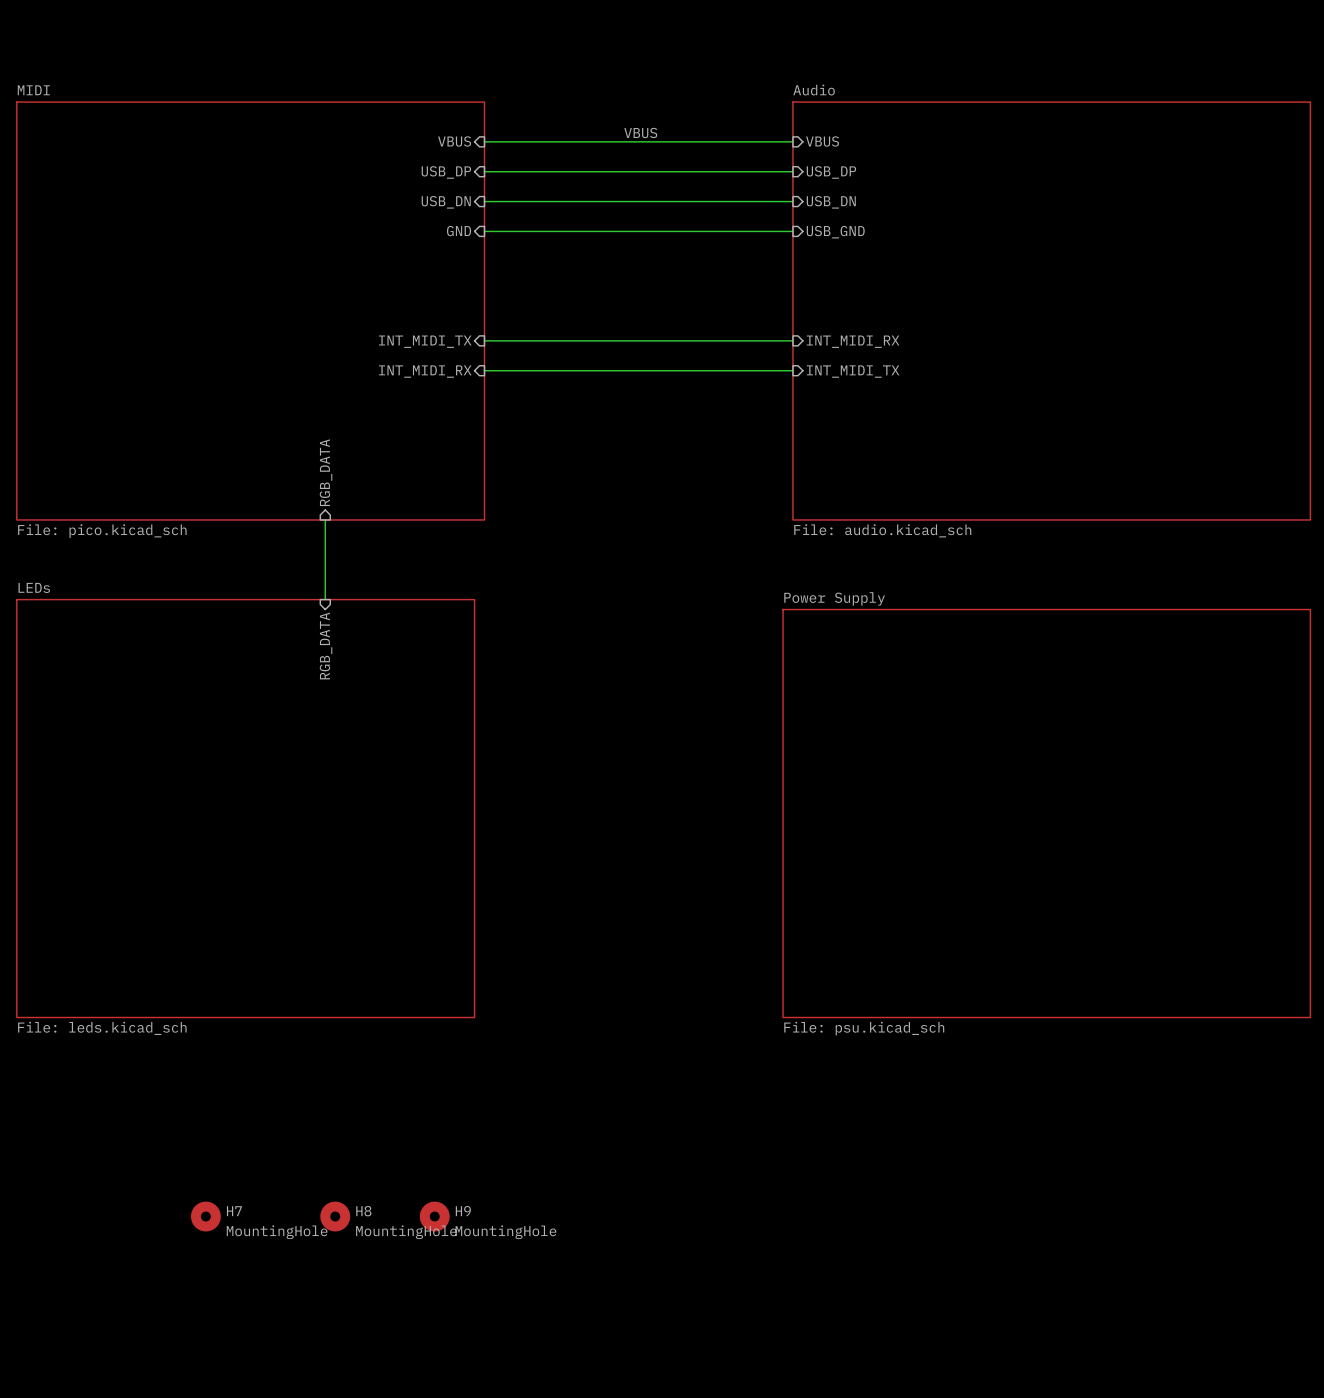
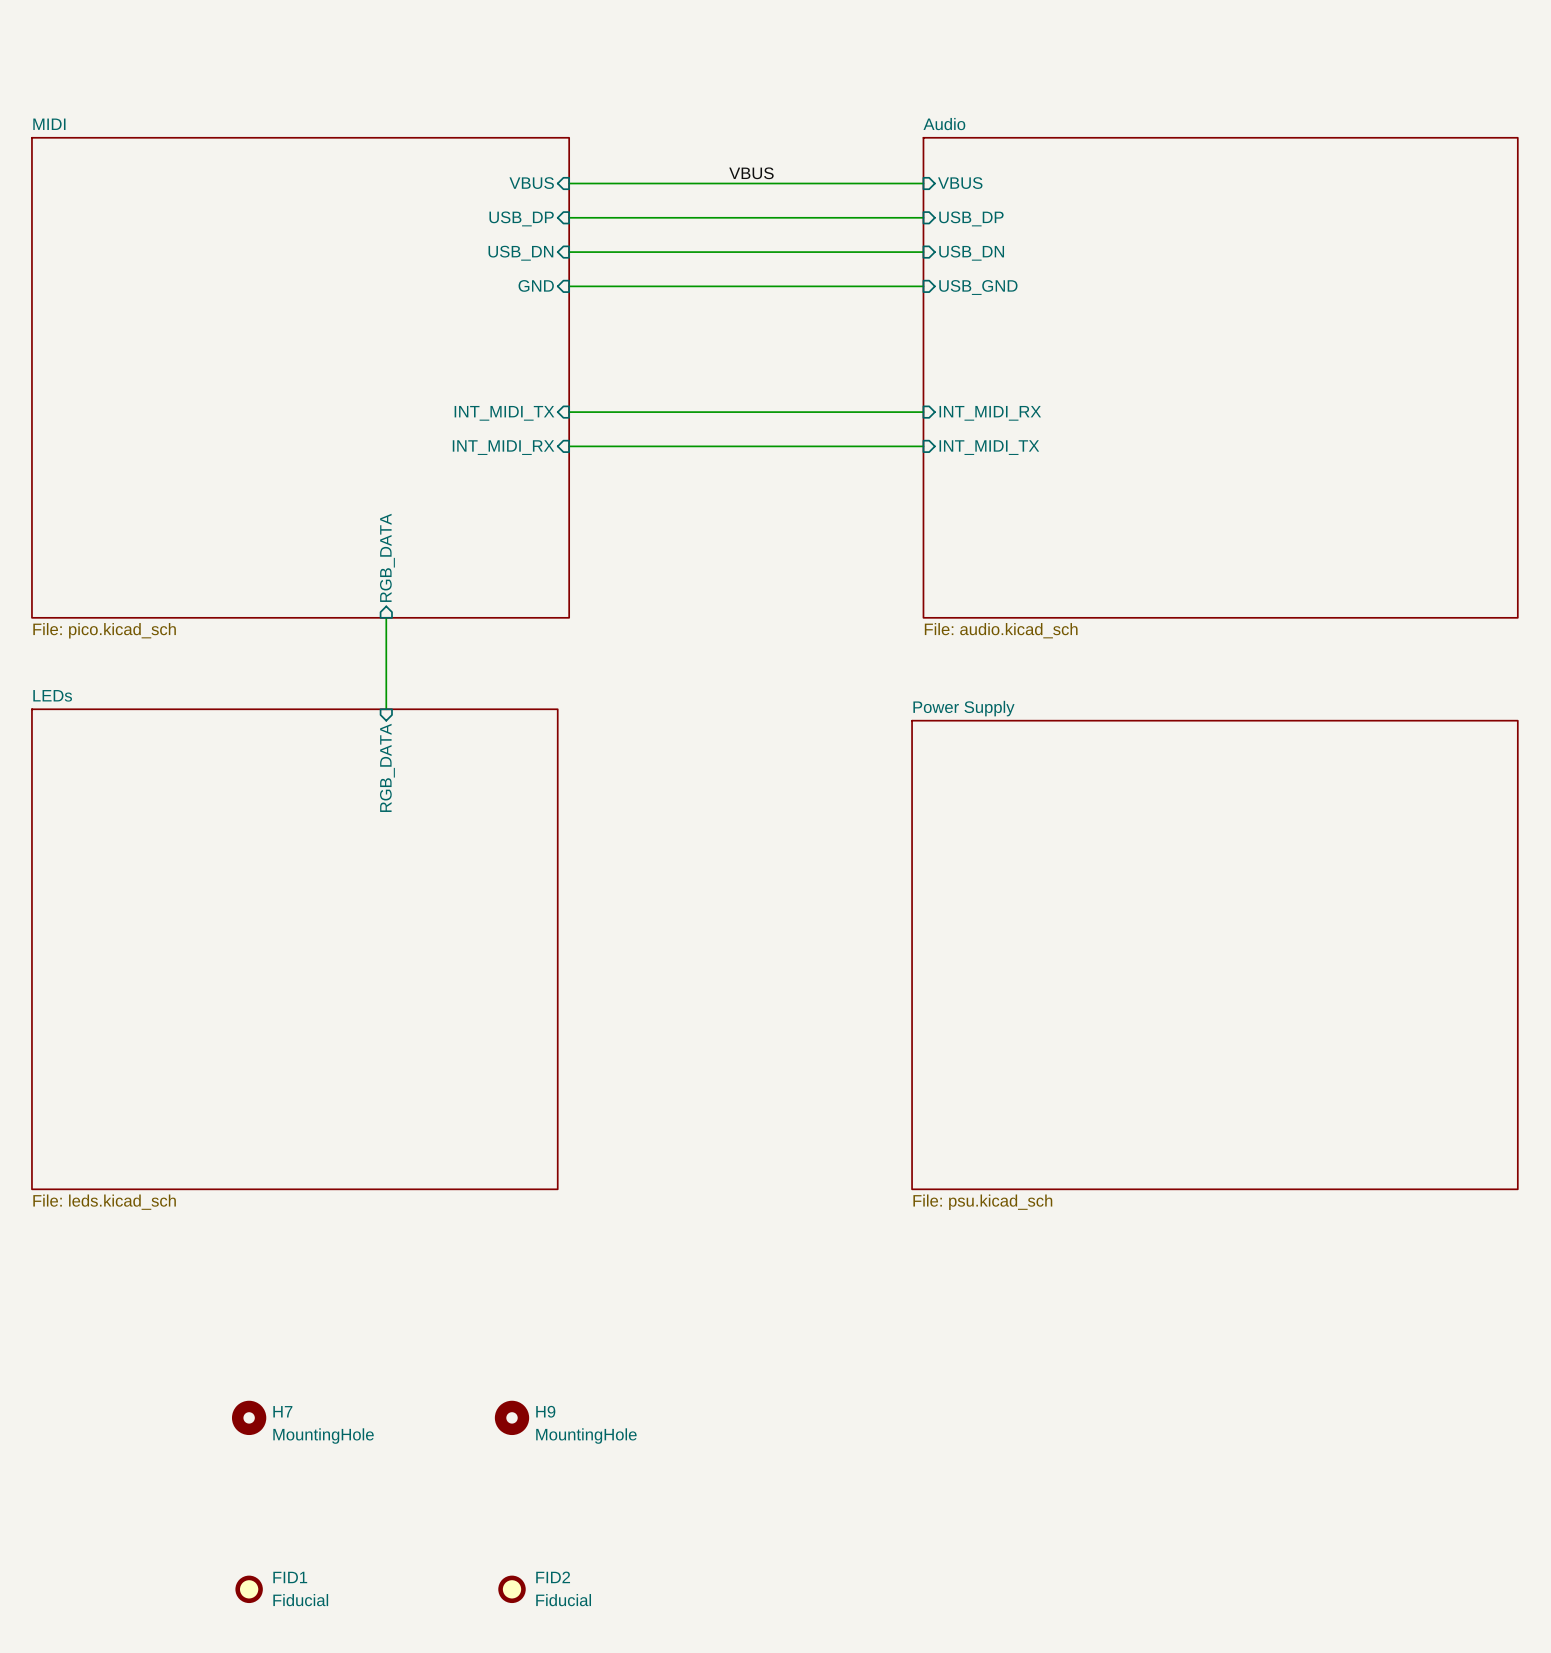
H8: MountingHole (335, 1216) -> none
FID1: none -> Fiducial (249, 1589)
FID2: none -> Fiducial (512, 1589)

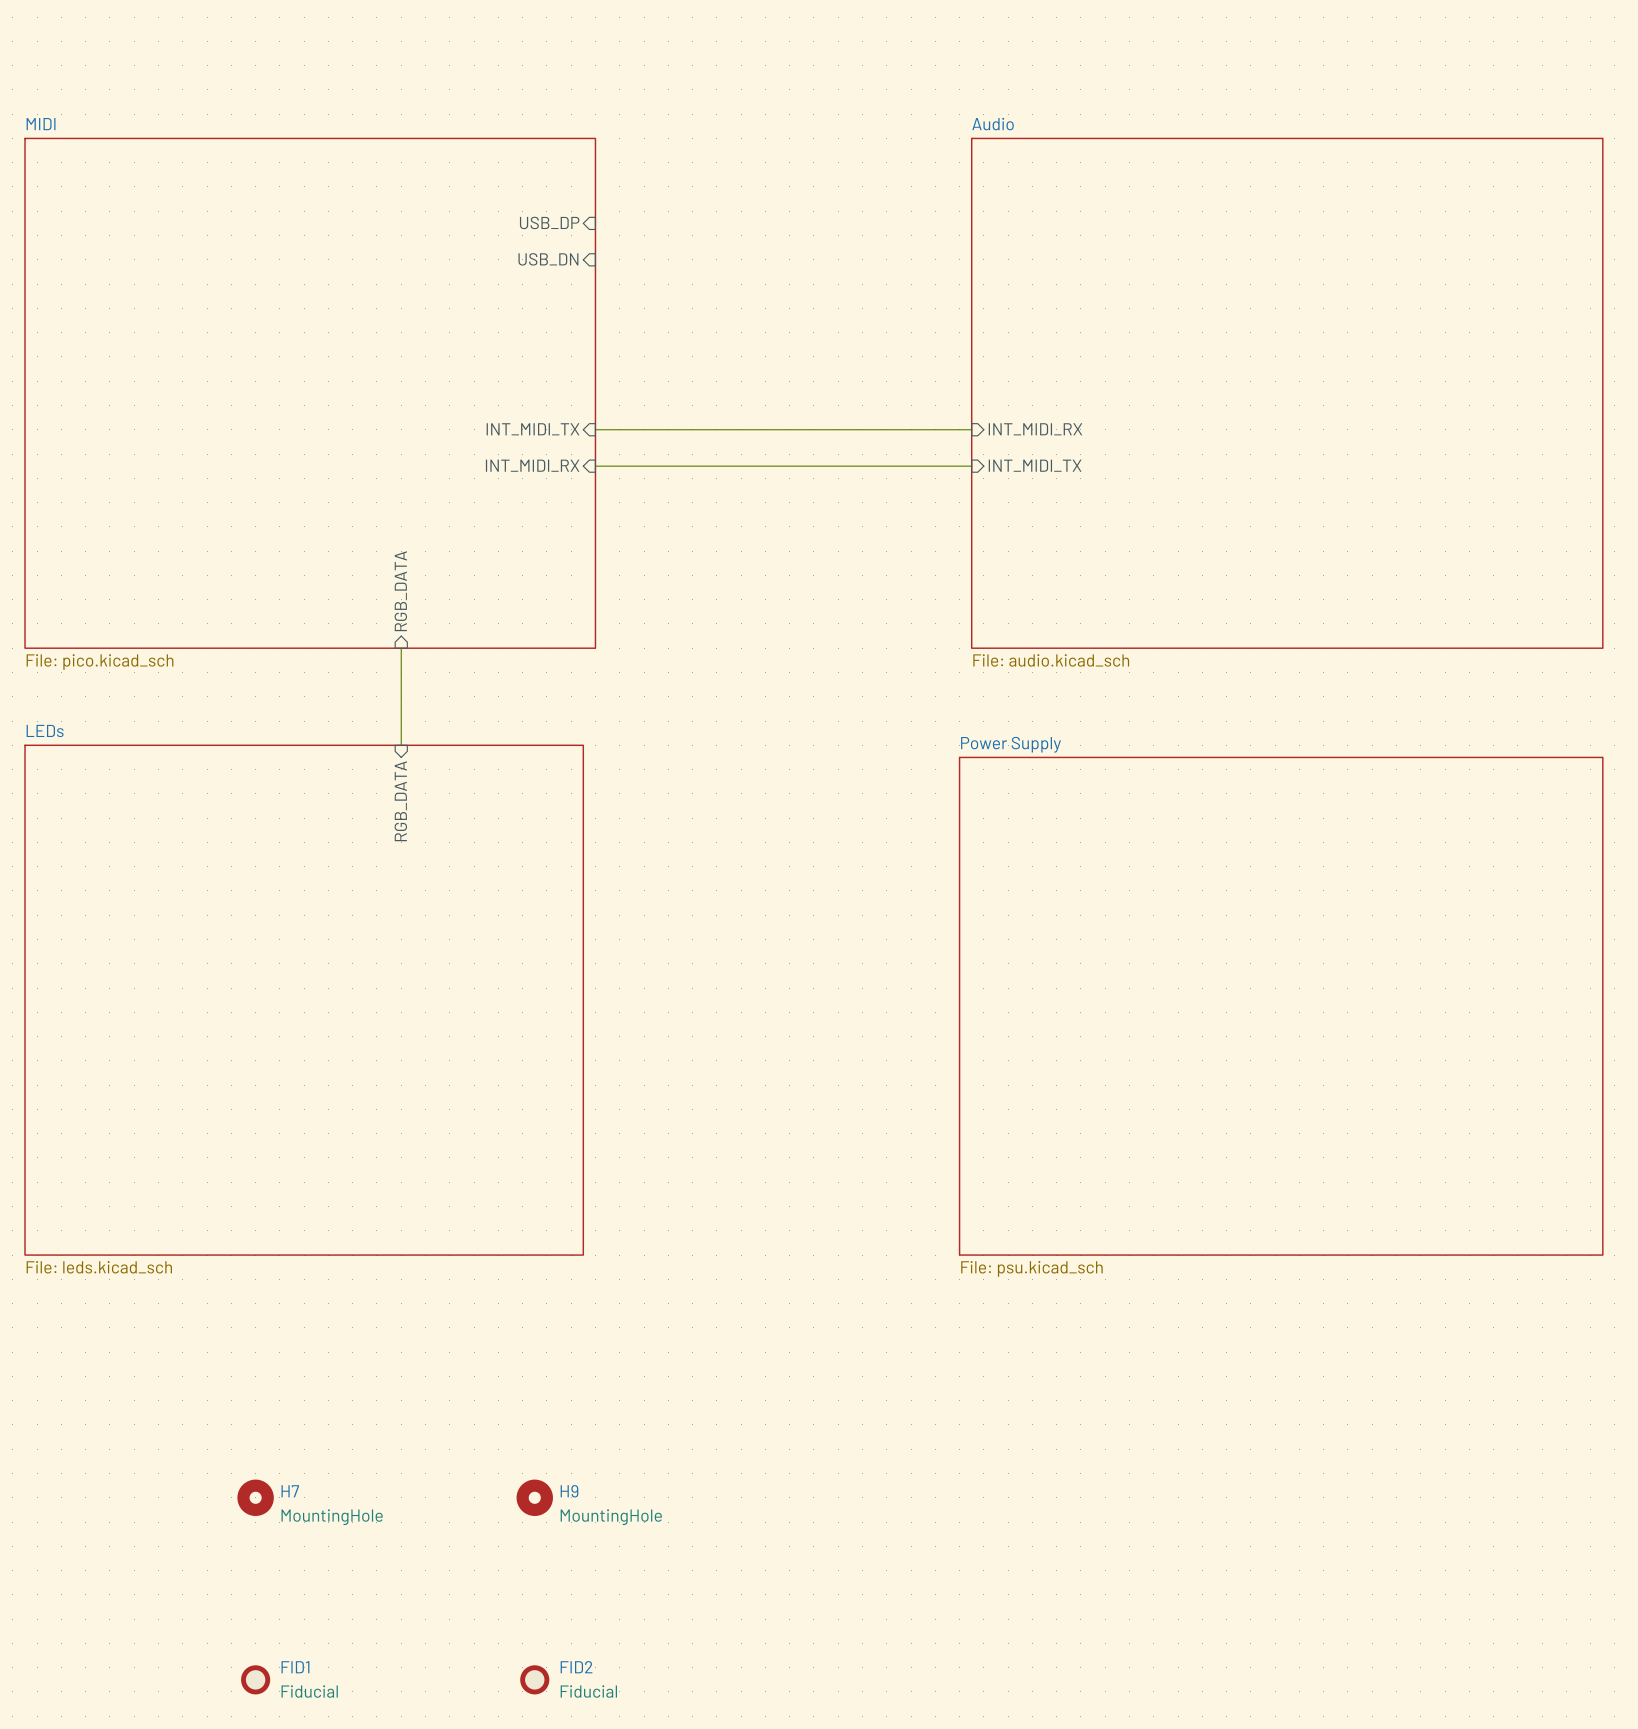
label: VBUS (751, 173) -> none
sheet pin: VBUS (531, 183) -> none
wire: (569, 183) (923, 183) -> none
sheet pin: VBUS (960, 183) -> none
wire: (569, 217) (923, 217) -> none
sheet pin: USB_DP (971, 218) -> none
wire: (569, 252) (923, 252) -> none
sheet pin: USB_DN (971, 253) -> none
sheet pin: GND (536, 285) -> none
wire: (569, 286) (923, 286) -> none
sheet pin: USB_GND (978, 287) -> none

